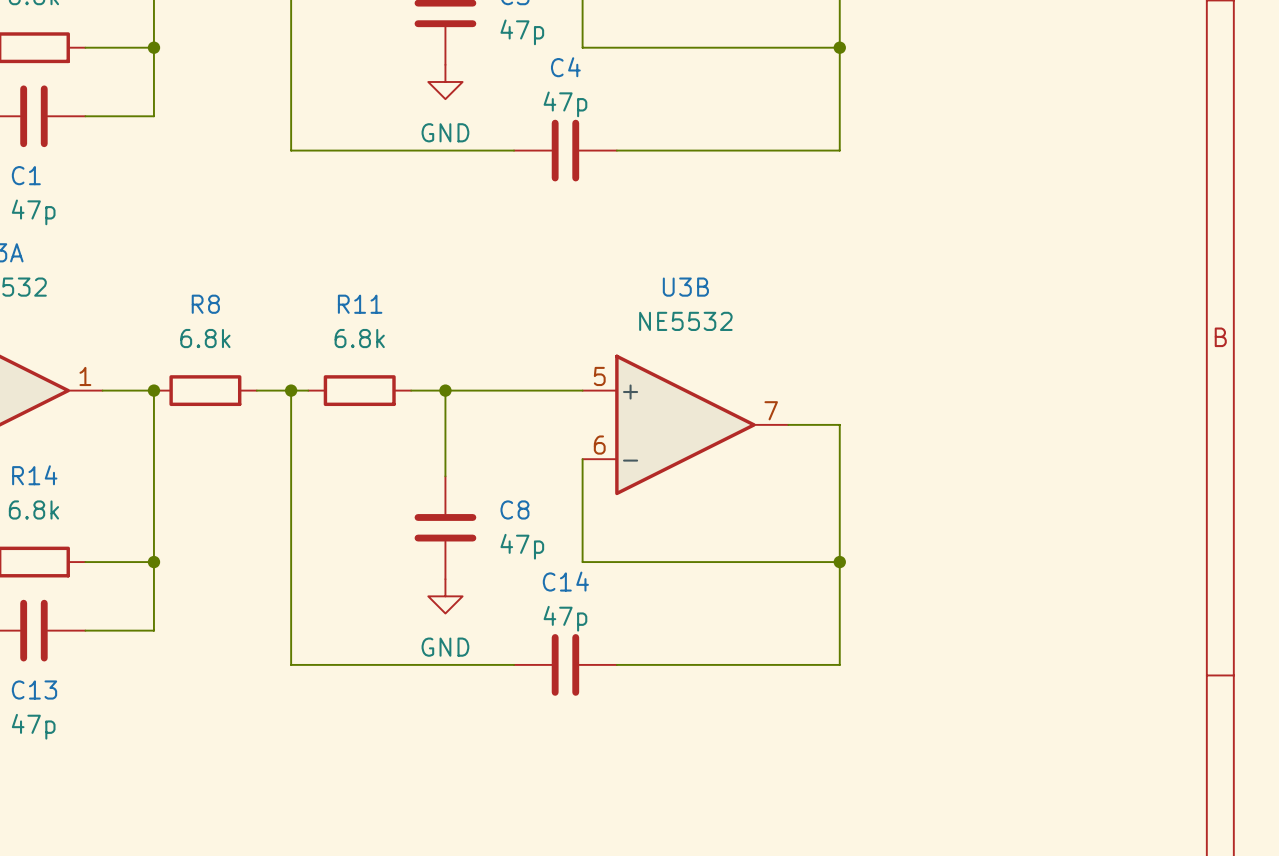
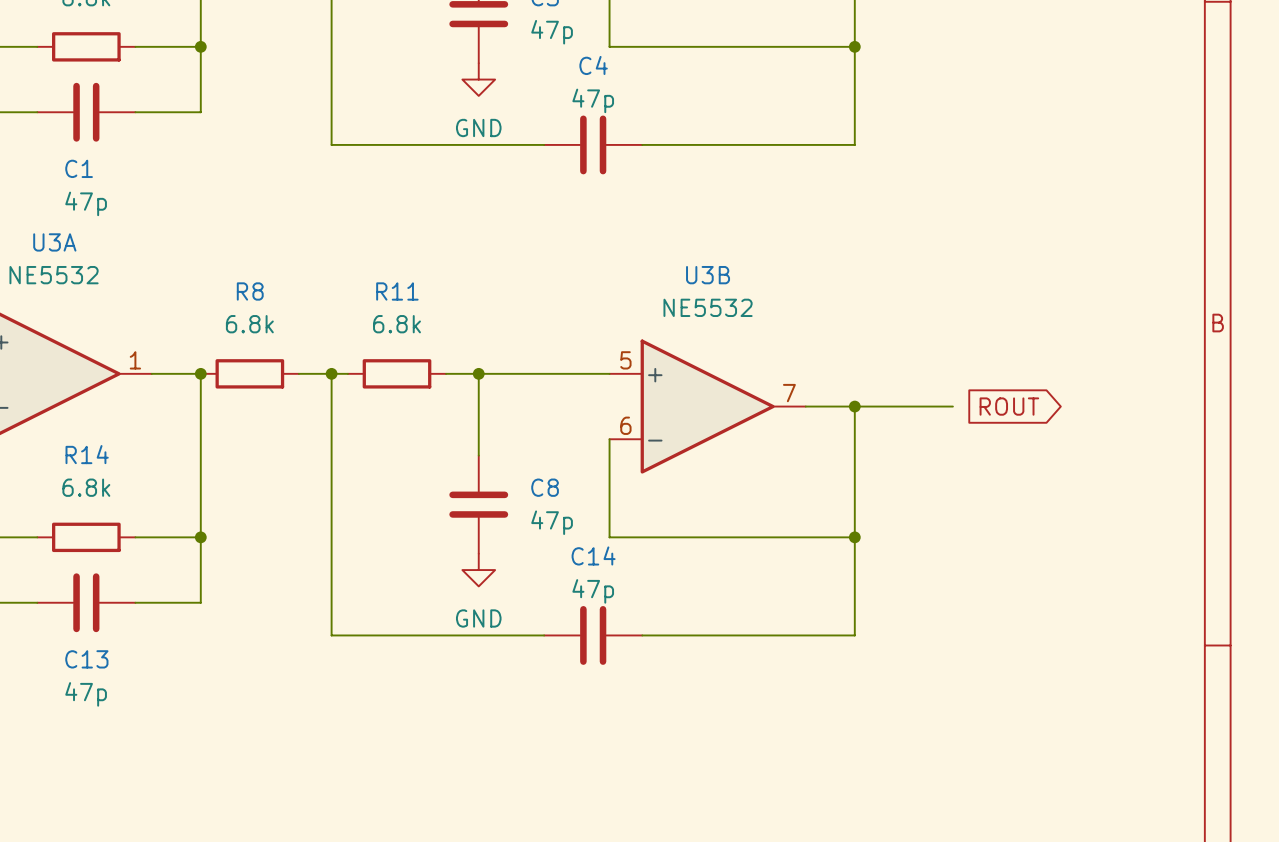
wire: none -> (854, 406) (952, 406)
junction: none -> (854, 406)
global label: none -> ROUT (1009, 406)

